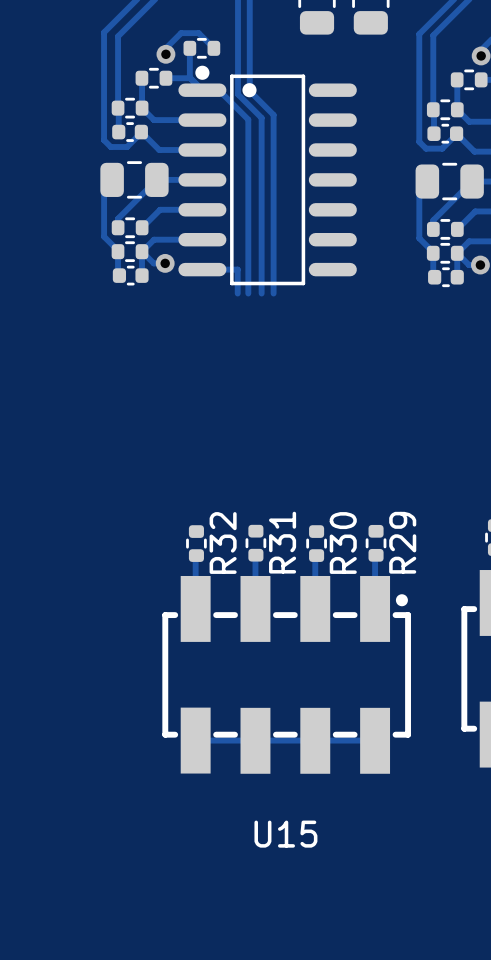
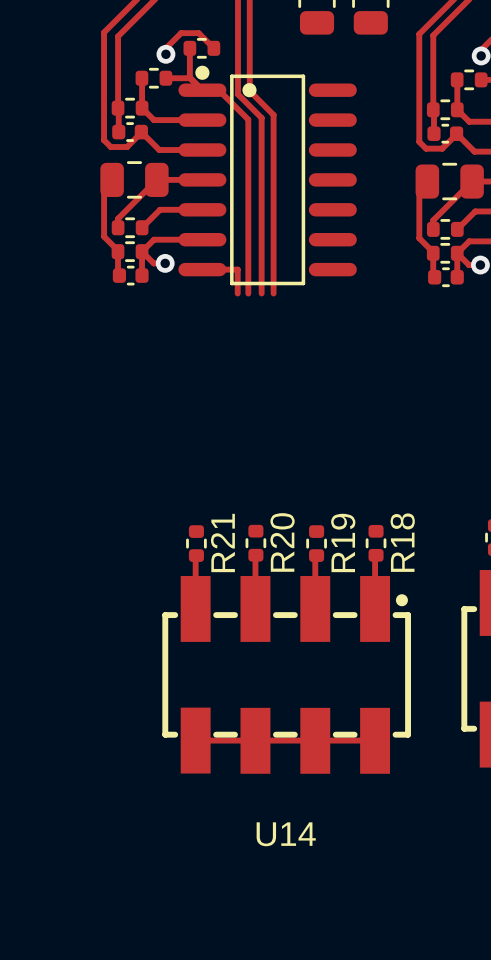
R31 name: R31 (282, 542) -> R20 (282, 542)
R29 name: R29 (402, 542) -> R18 (402, 542)
R32 name: R32 (223, 543) -> R21 (222, 543)
R30 name: R30 (343, 543) -> R19 (343, 542)
U15 name: U15 (285, 834) -> U14 (286, 834)

